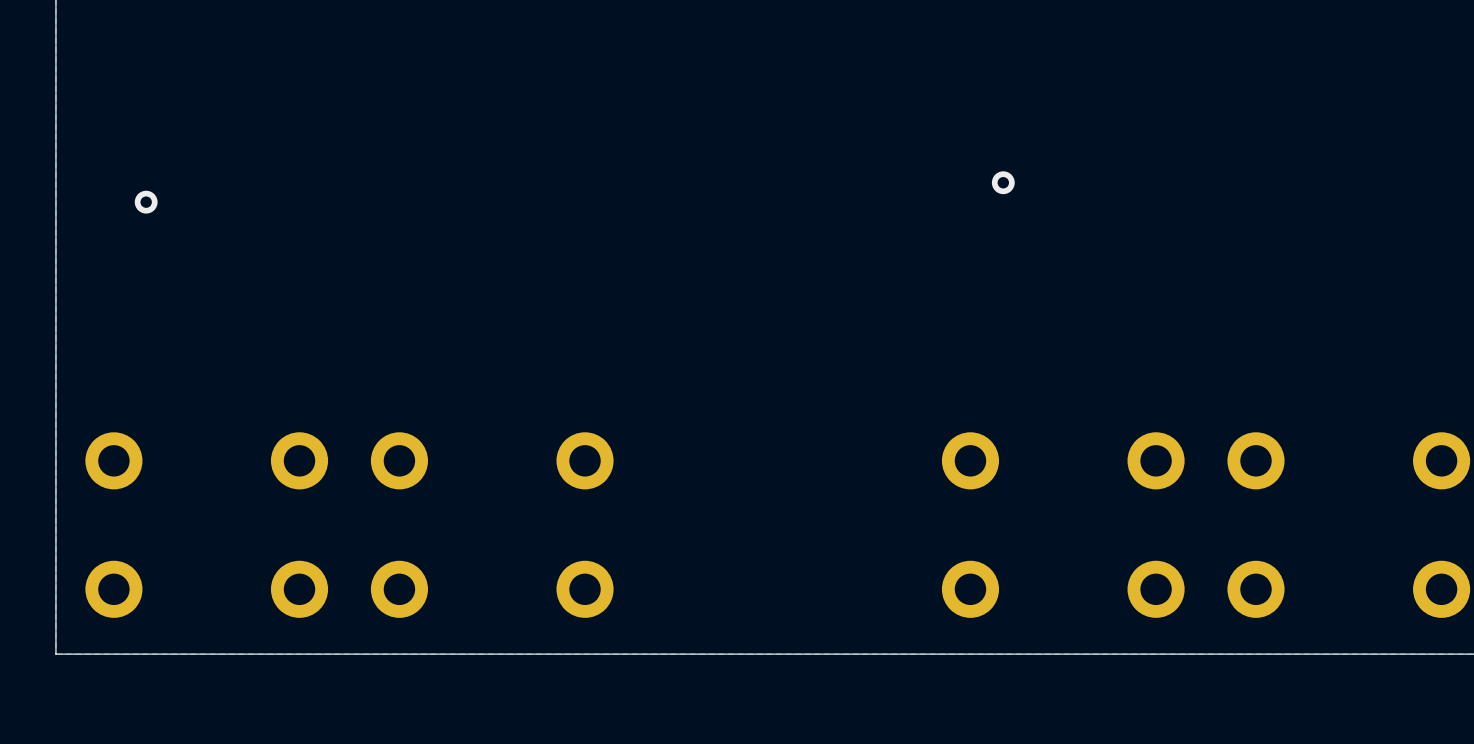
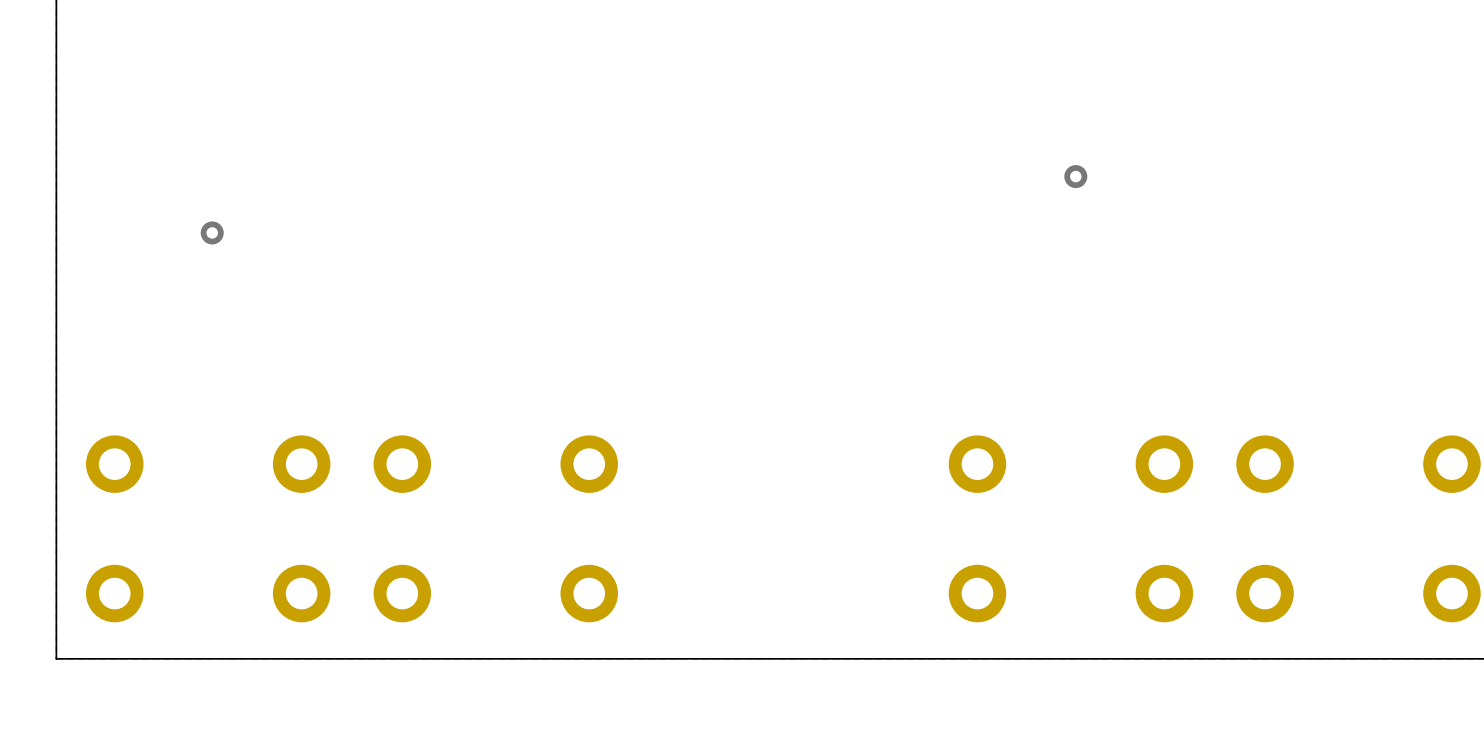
via position: (1003, 182) -> (1075, 176)
via position: (146, 202) -> (212, 232)

